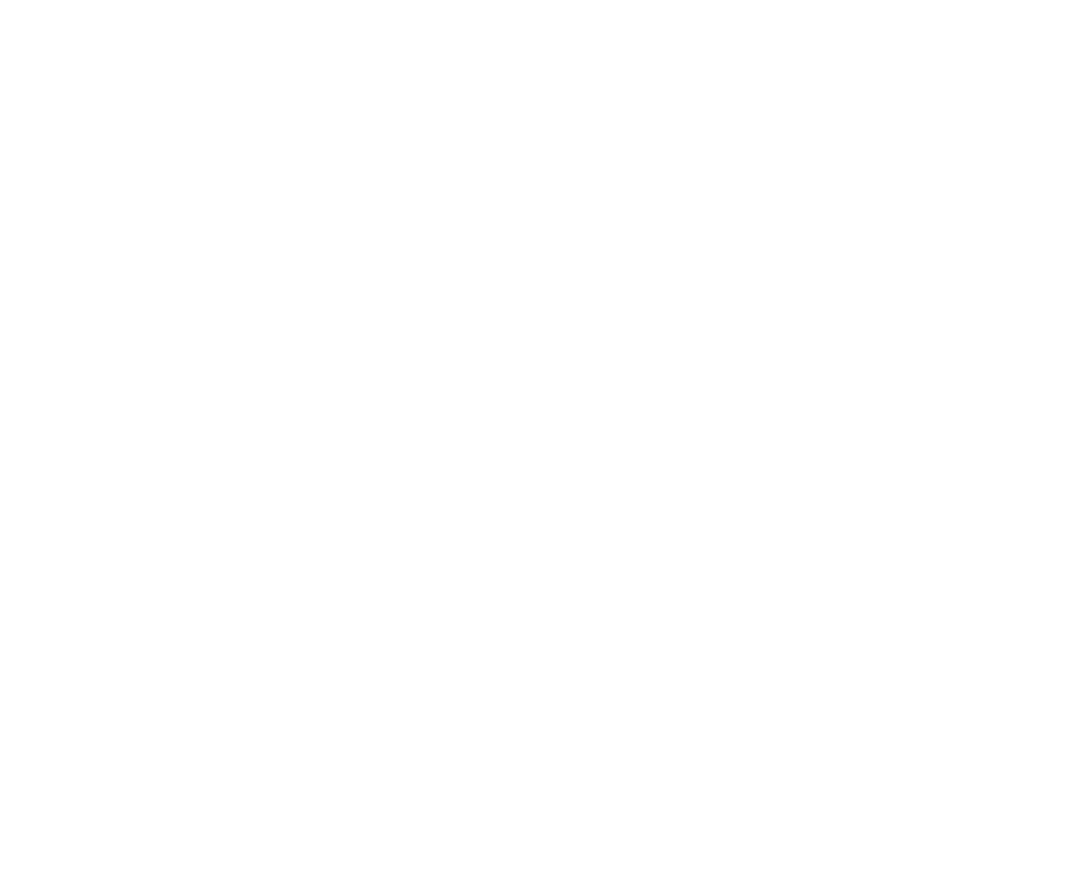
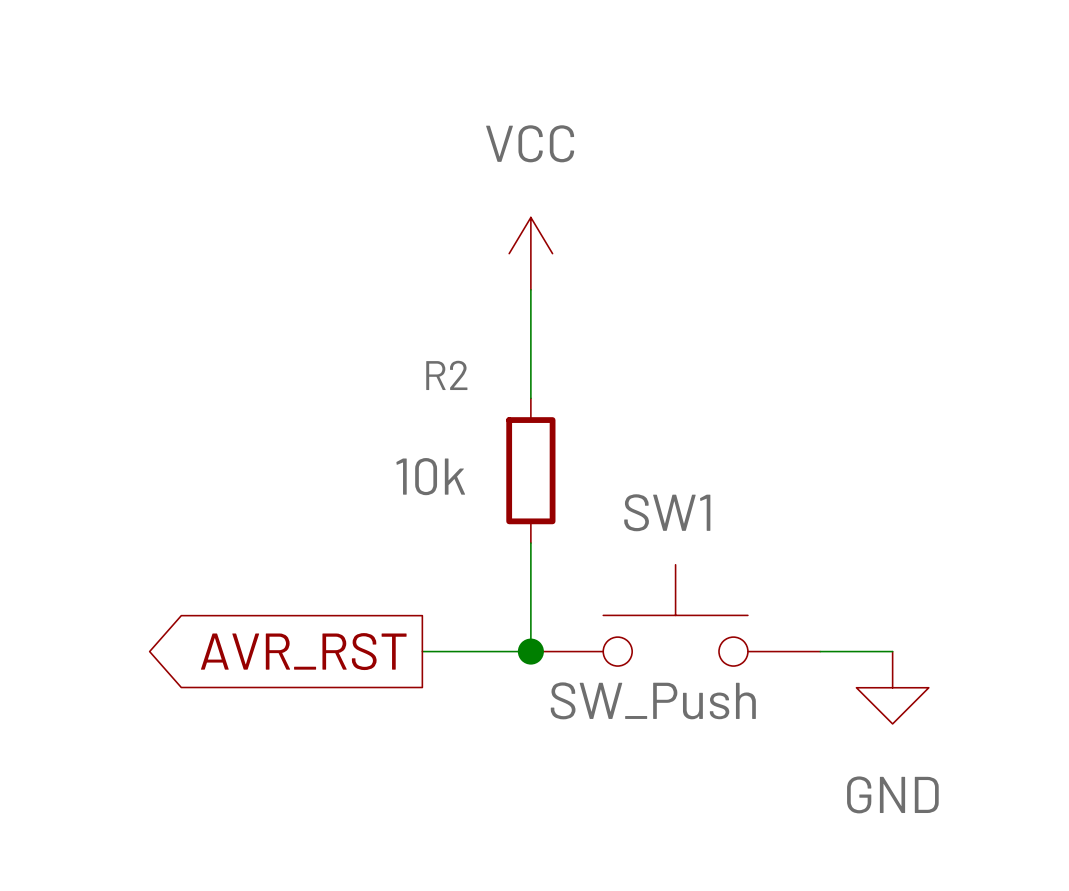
power symbol: none -> VCC (530, 253)
wire: none -> (530, 289) (530, 398)
R2: none -> 10k (530, 470)
wire: none -> (530, 543) (530, 651) (422, 651)
SW1: none -> SW_Push (675, 615)
global label: none -> AVR_RST (303, 651)
junction: none -> (530, 651)
wire: none -> (820, 651) (892, 651)
power symbol: none -> GND (892, 687)

